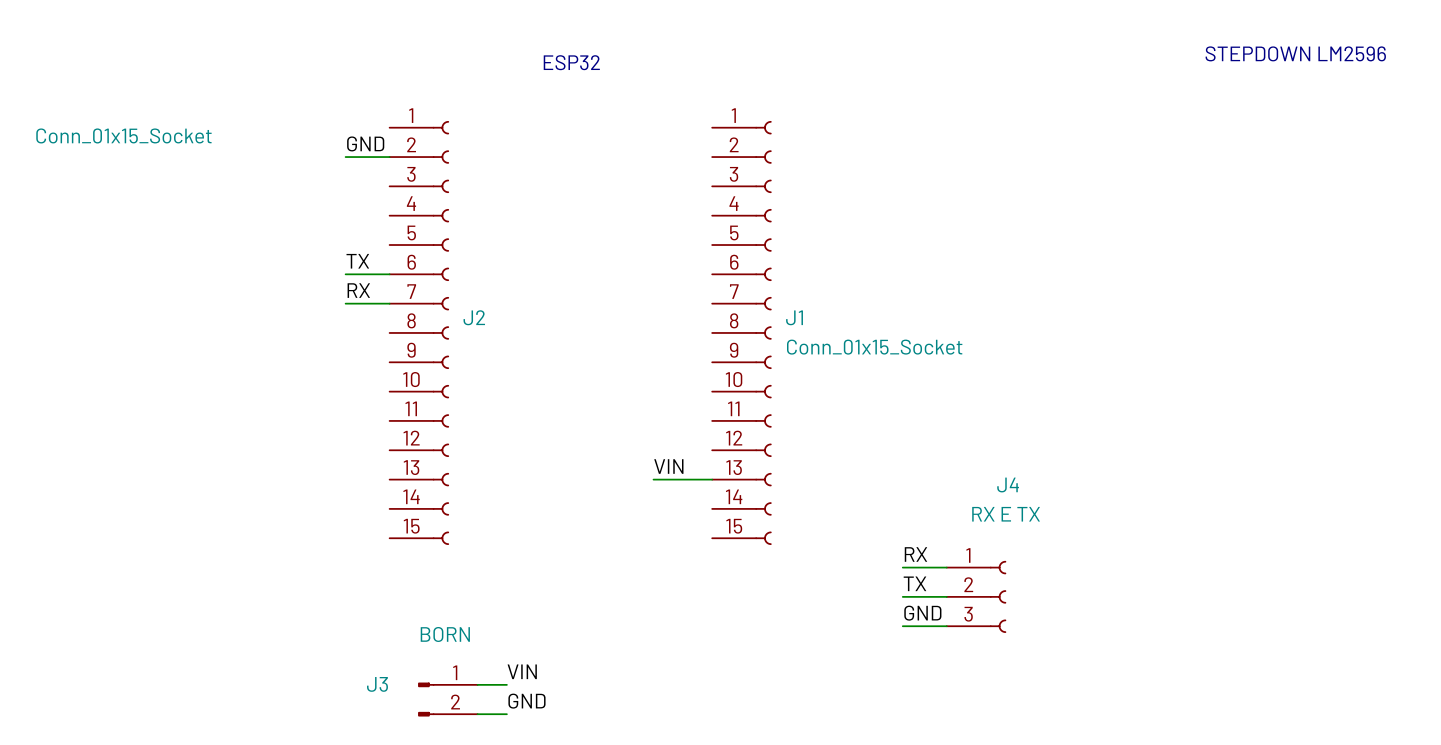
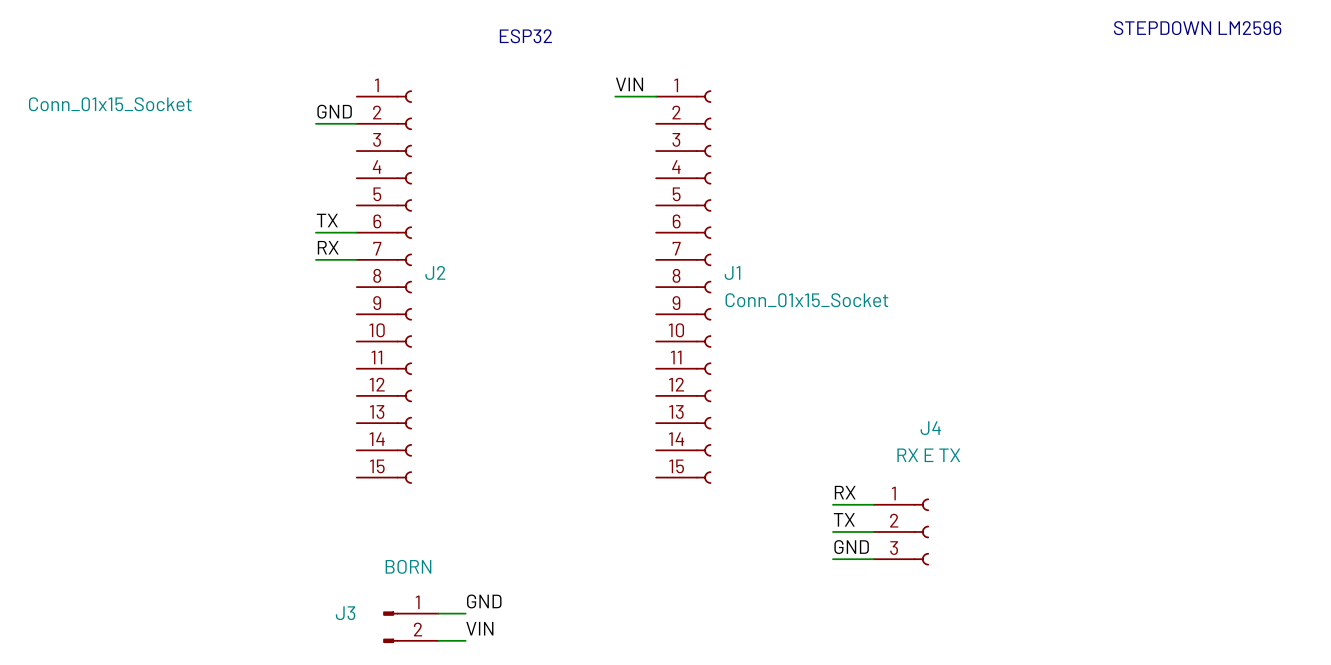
label: none -> VIN (629, 84)
wire: none -> (615, 96) (656, 96)
label: VIN (668, 466) -> none
wire: (653, 479) (712, 479) -> none
label: VIN (522, 671) -> GND (484, 601)
label: GND (526, 701) -> VIN (479, 628)

